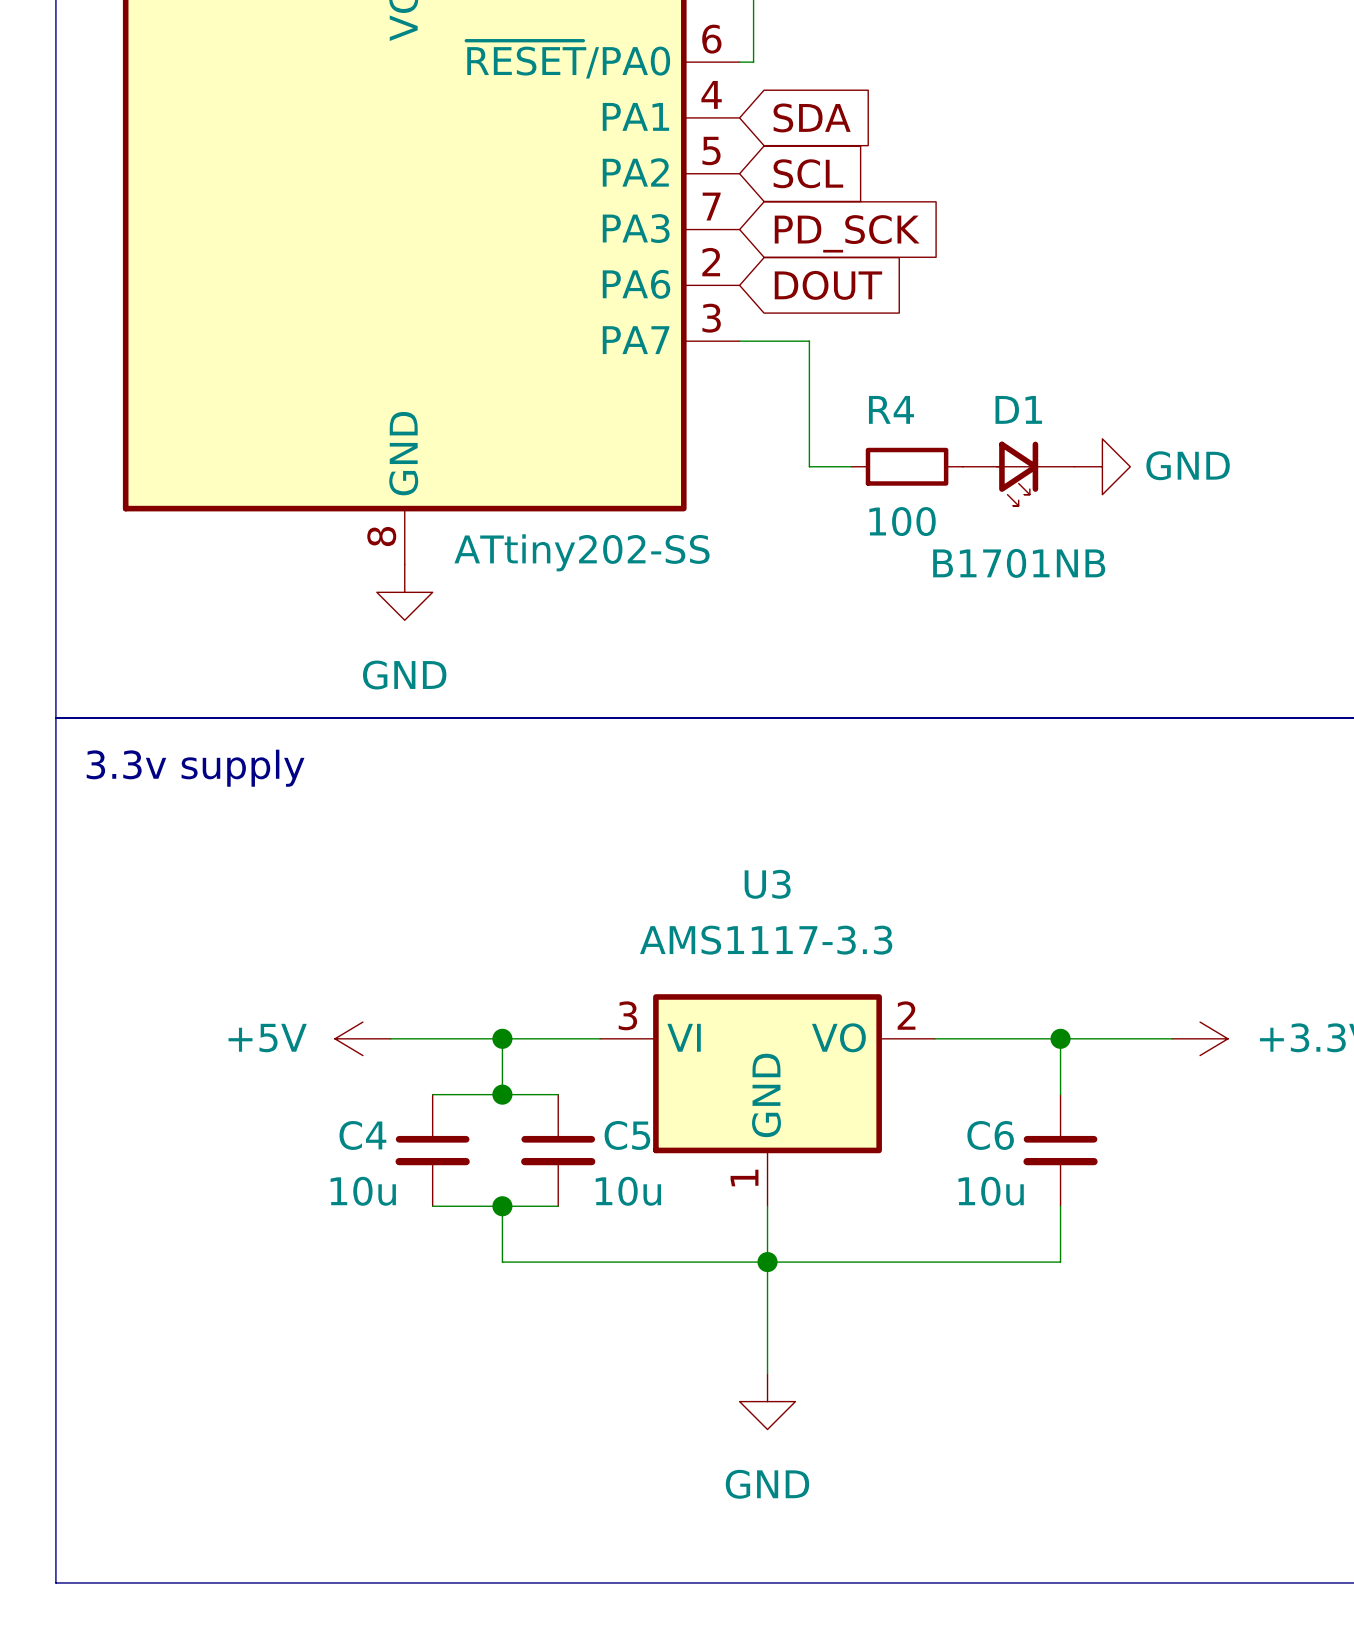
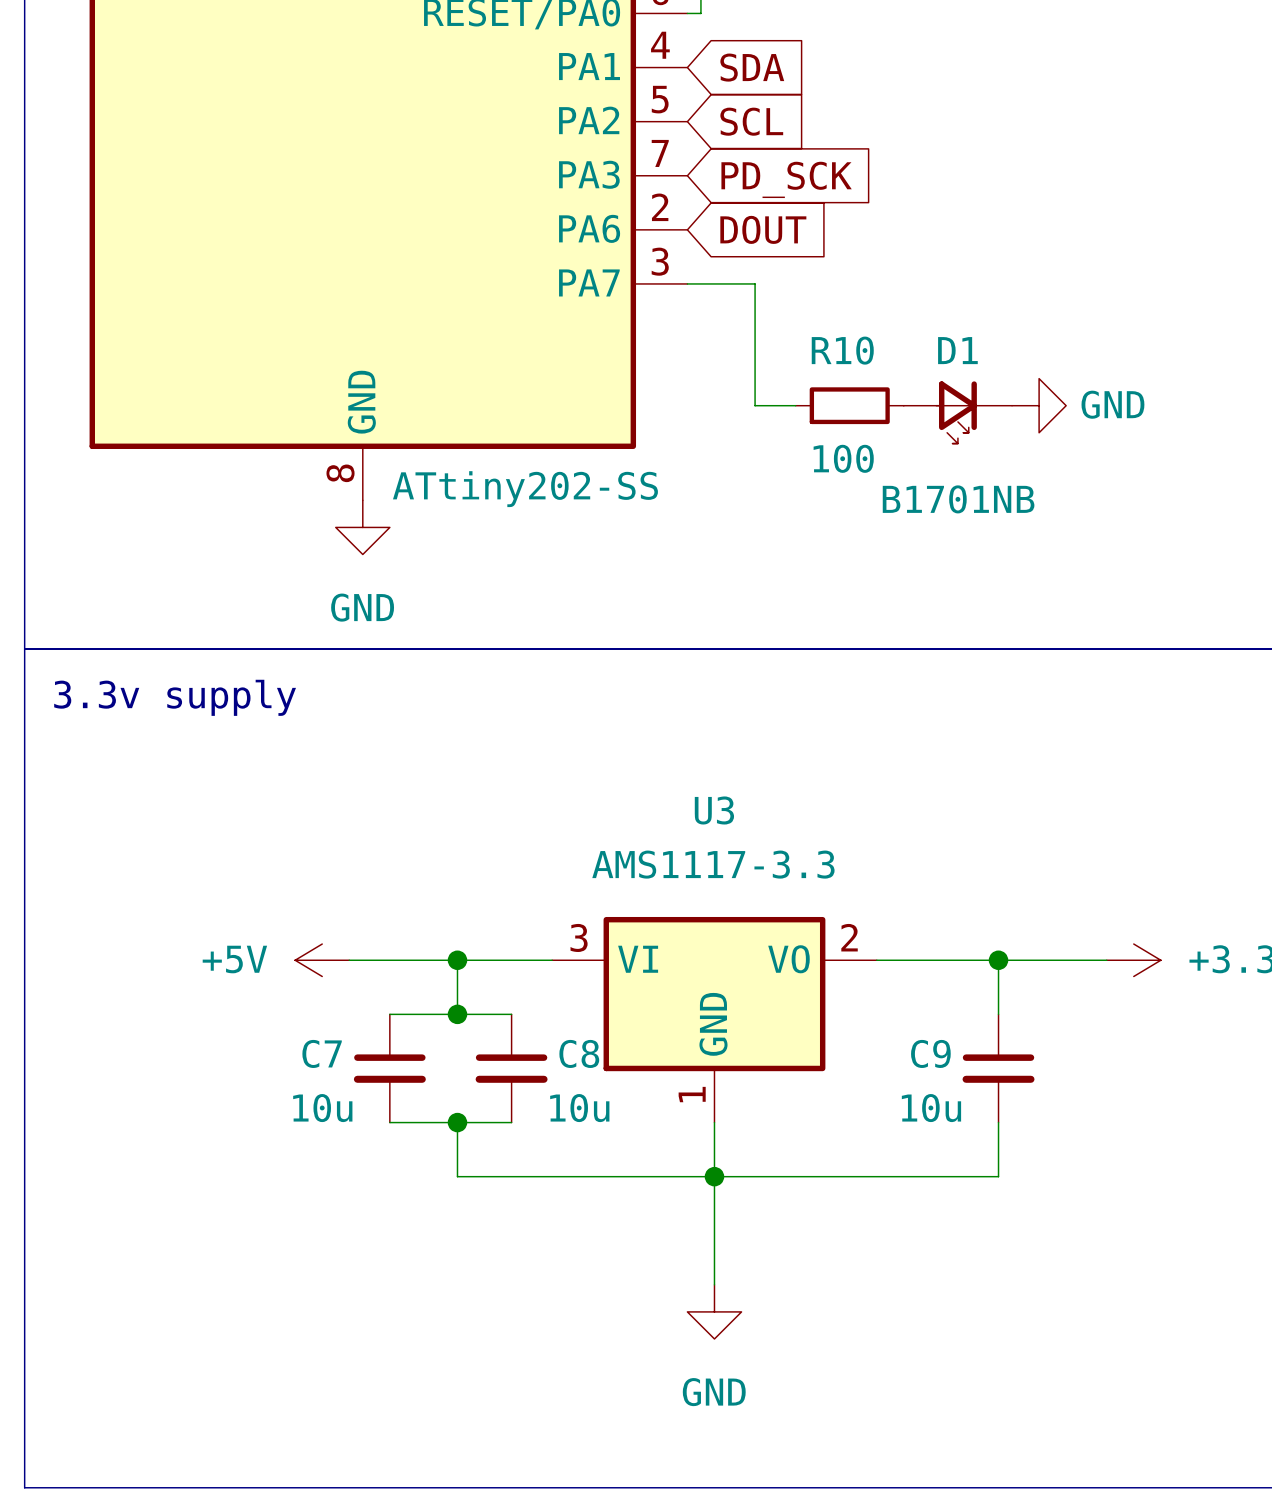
R4 name: R4 (891, 409) -> R10 (842, 350)
C4 name: C4 (362, 1135) -> C7 (322, 1053)
C5 name: C5 (627, 1135) -> C8 (579, 1053)
C6 name: C6 (990, 1135) -> C9 (930, 1053)

